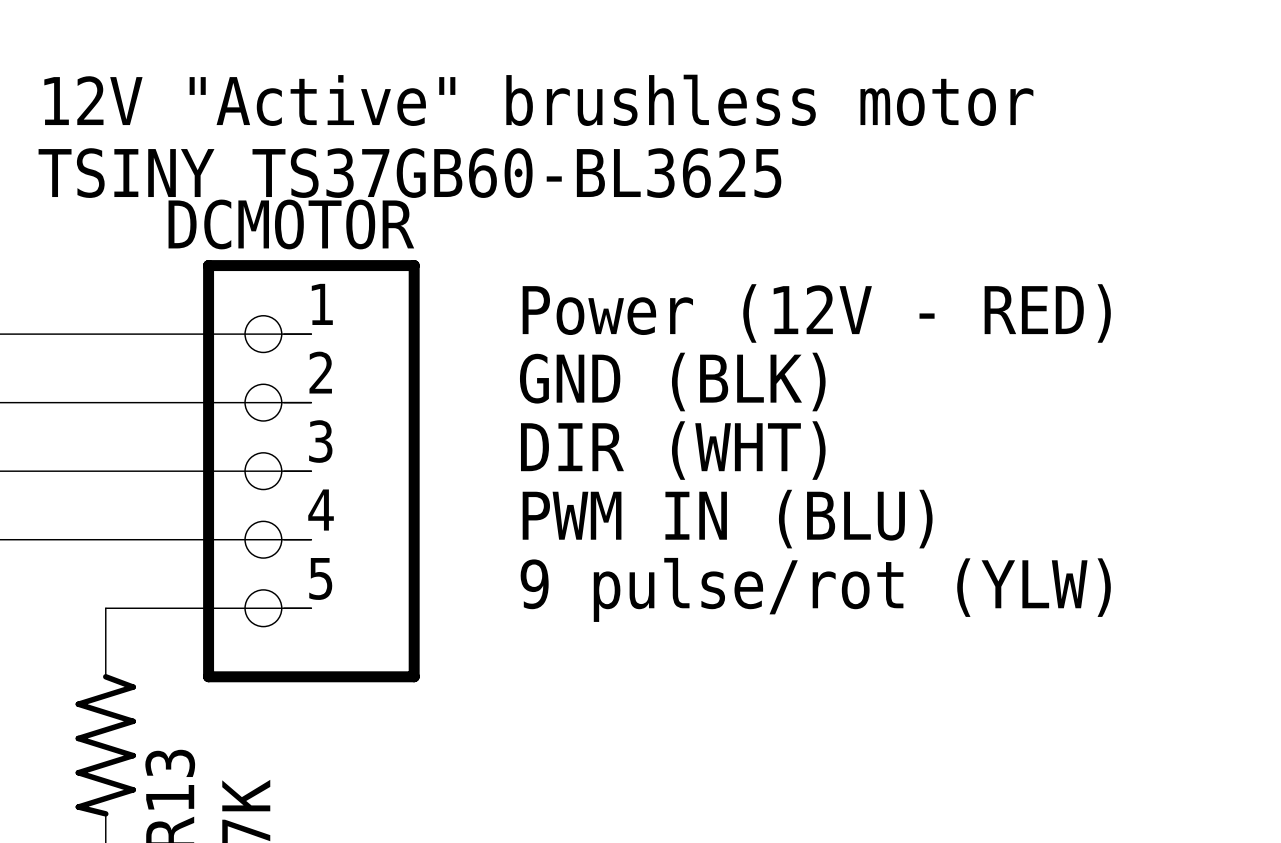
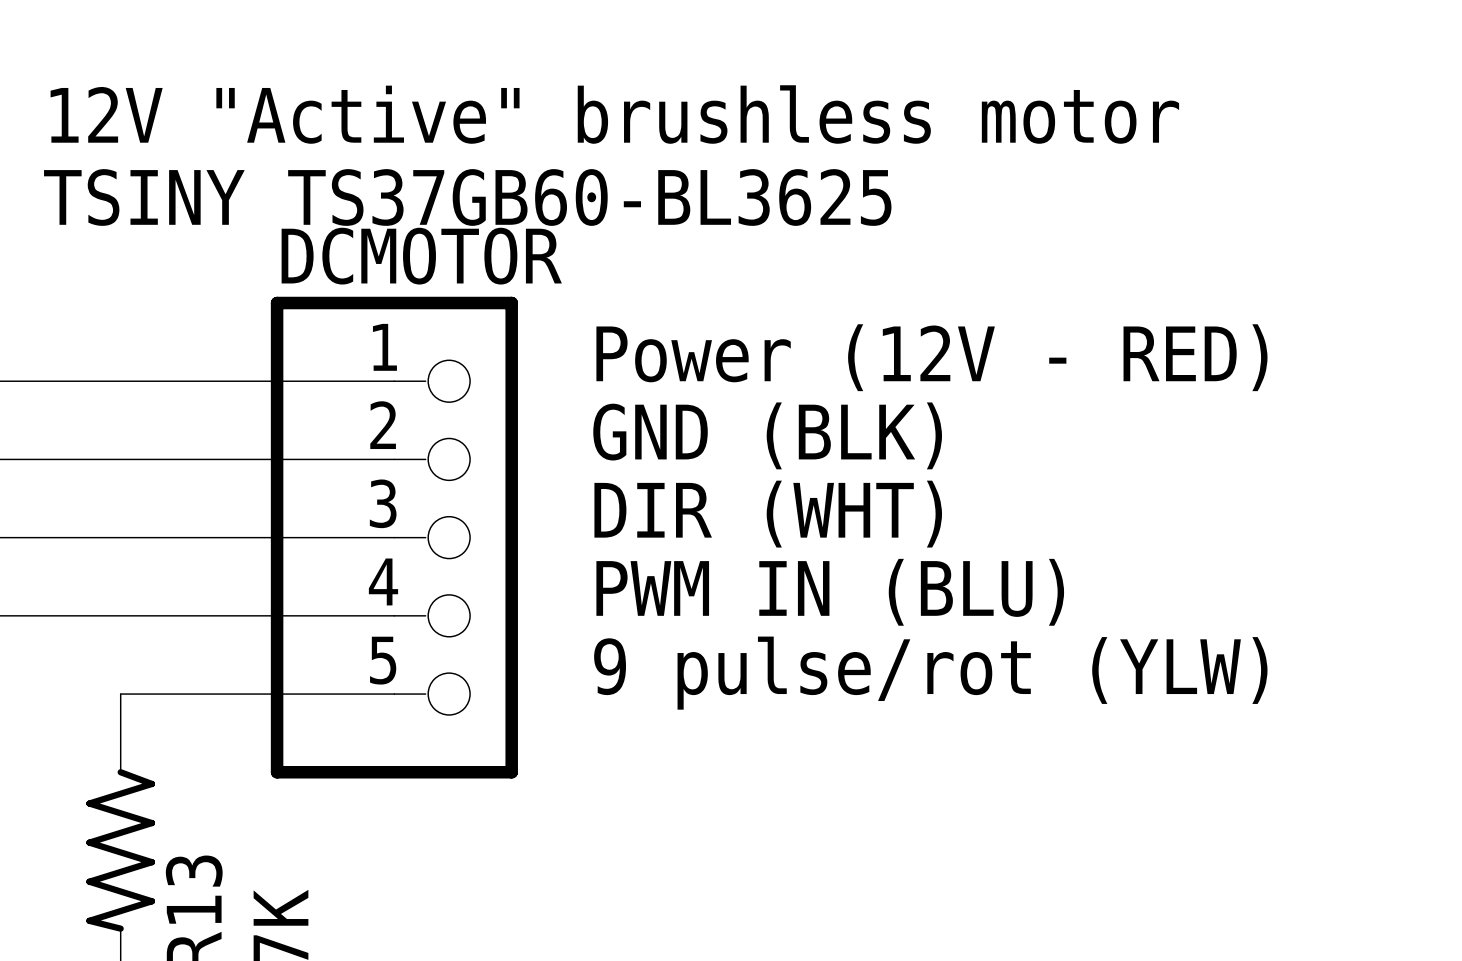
wire: none -> (355, 381) (394, 381)
wire: none -> (355, 459) (394, 459)
wire: none -> (355, 537) (394, 537)
DCMOTOR: (311, 471) -> none
DCMOTOR: none -> (394, 537)
wire: none -> (355, 615) (394, 615)
wire: none -> (355, 694) (394, 694)

